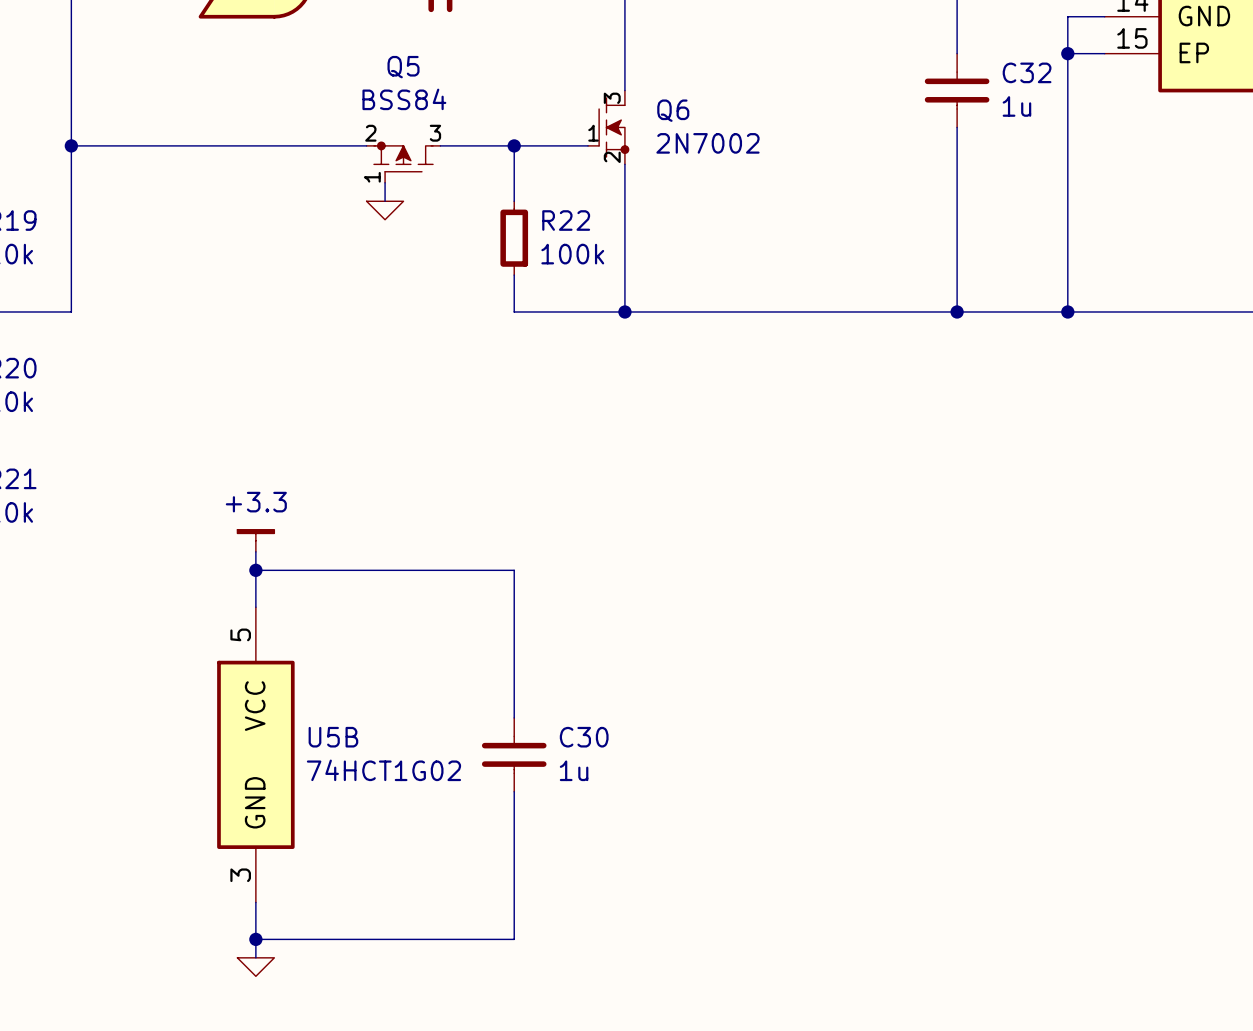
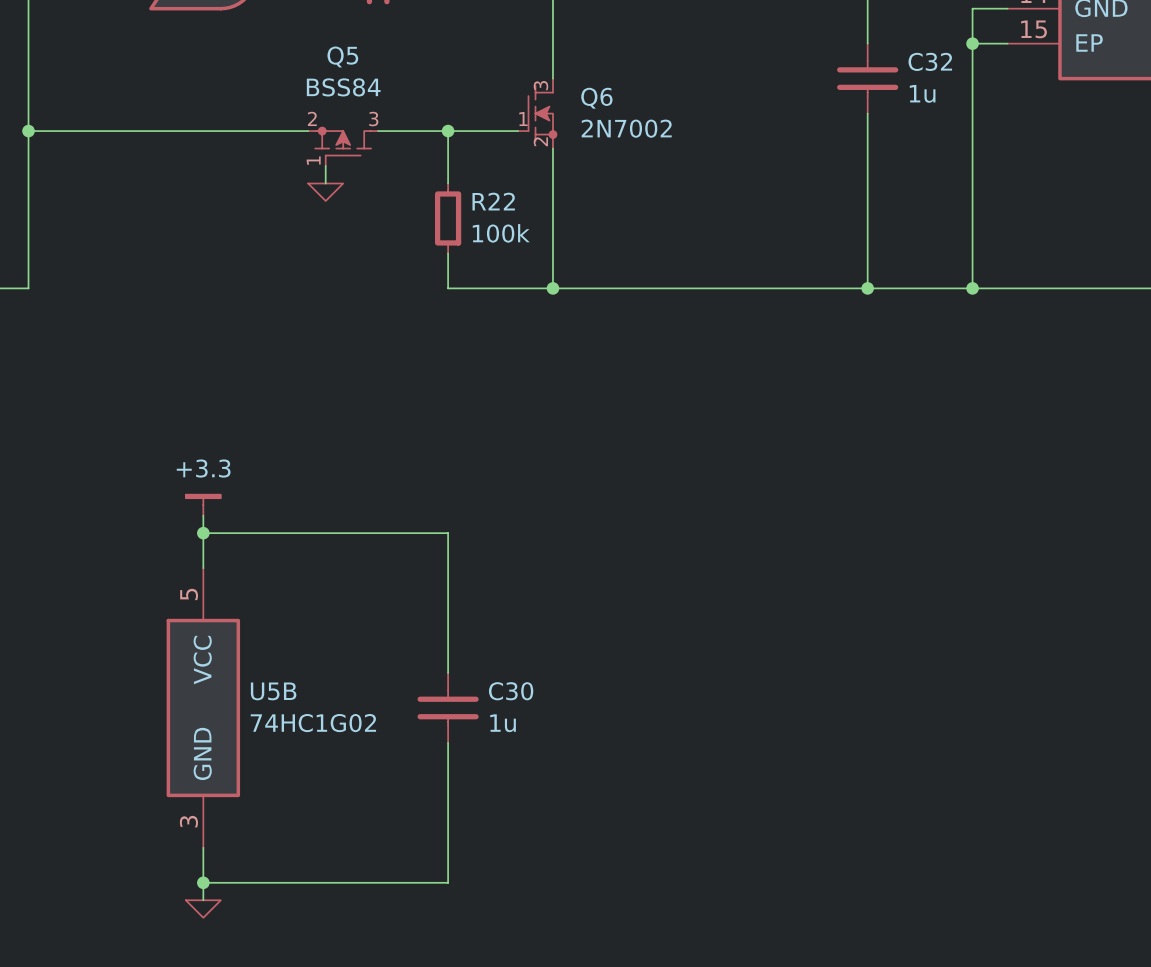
U5B value: 74HCT1G02 (383, 770) -> 74HC1G02 (313, 723)

